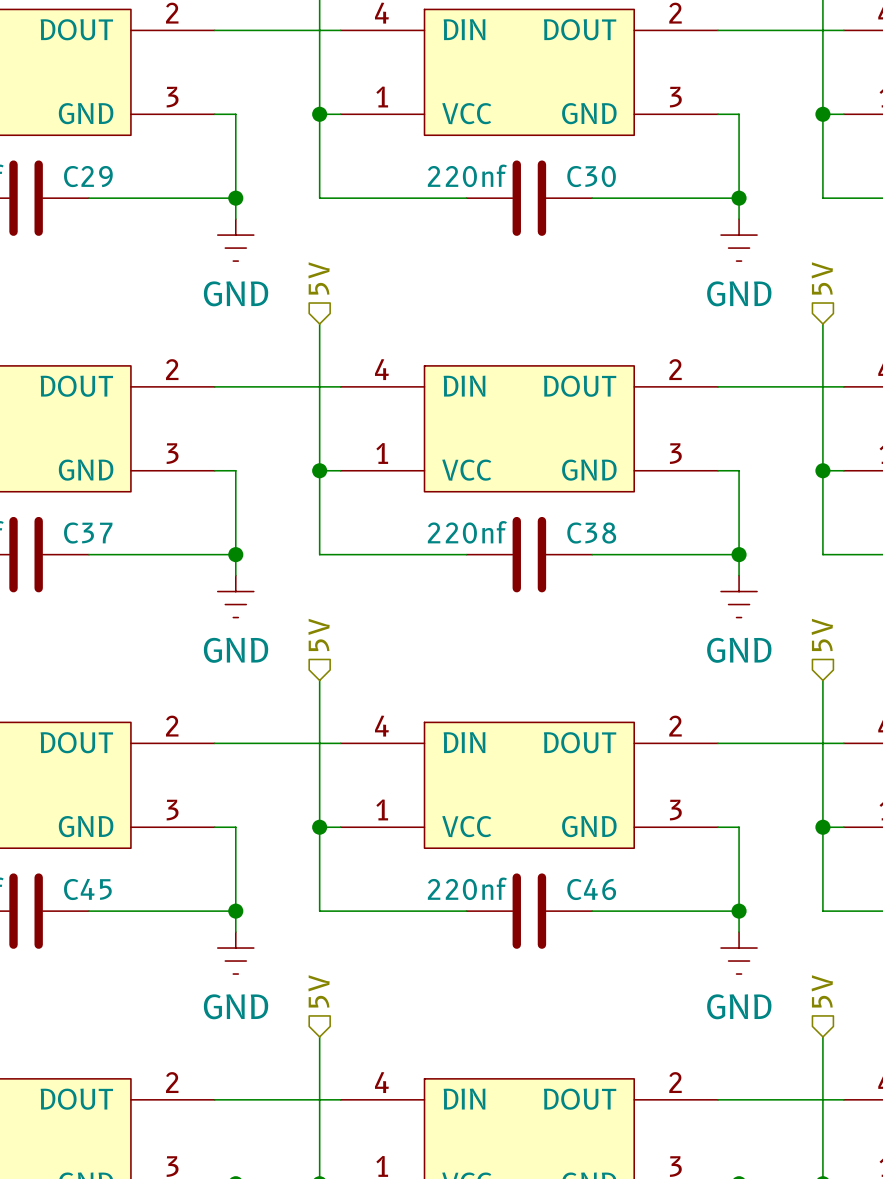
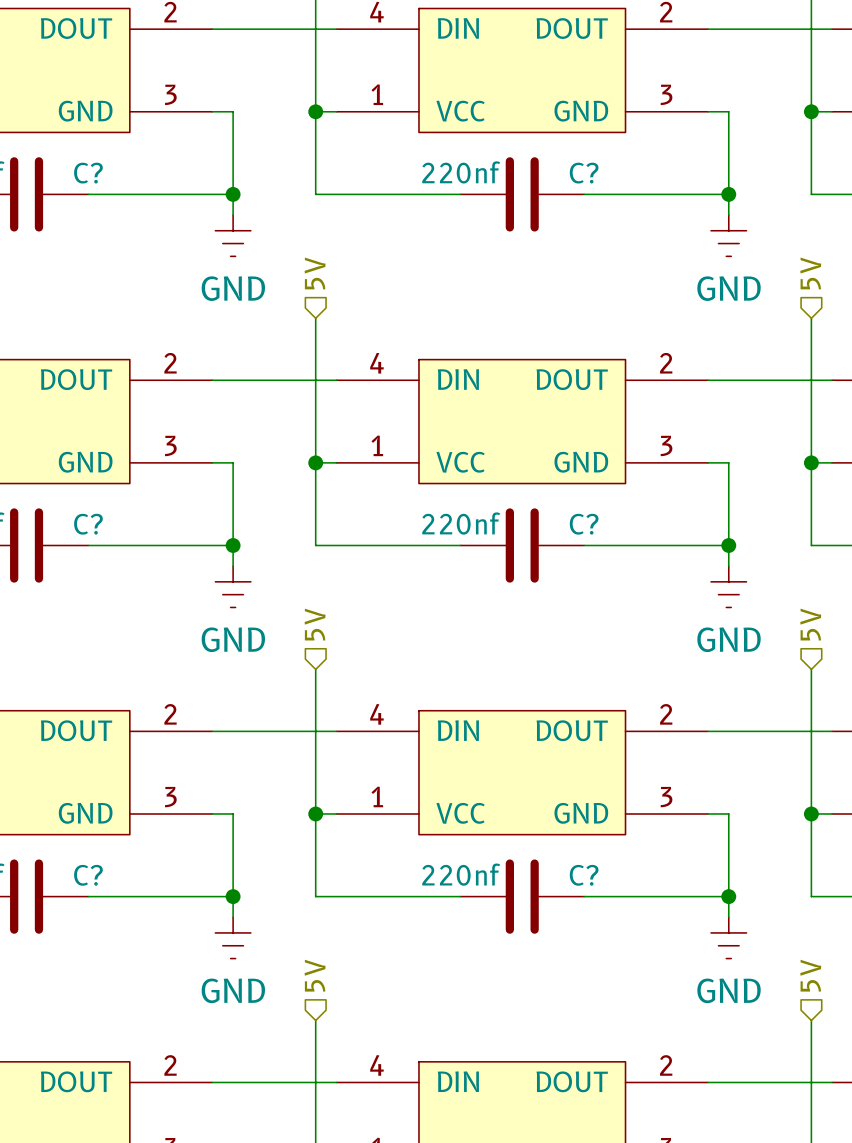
C29 name: C29 (88, 176) -> C? (88, 173)
C30 name: C30 (591, 176) -> C? (584, 173)
C37 name: C37 (88, 533) -> C? (88, 524)
C38 name: C38 (591, 533) -> C? (584, 524)
C45 name: C45 (87, 889) -> C? (88, 875)
C46 name: C46 (591, 889) -> C? (584, 875)

